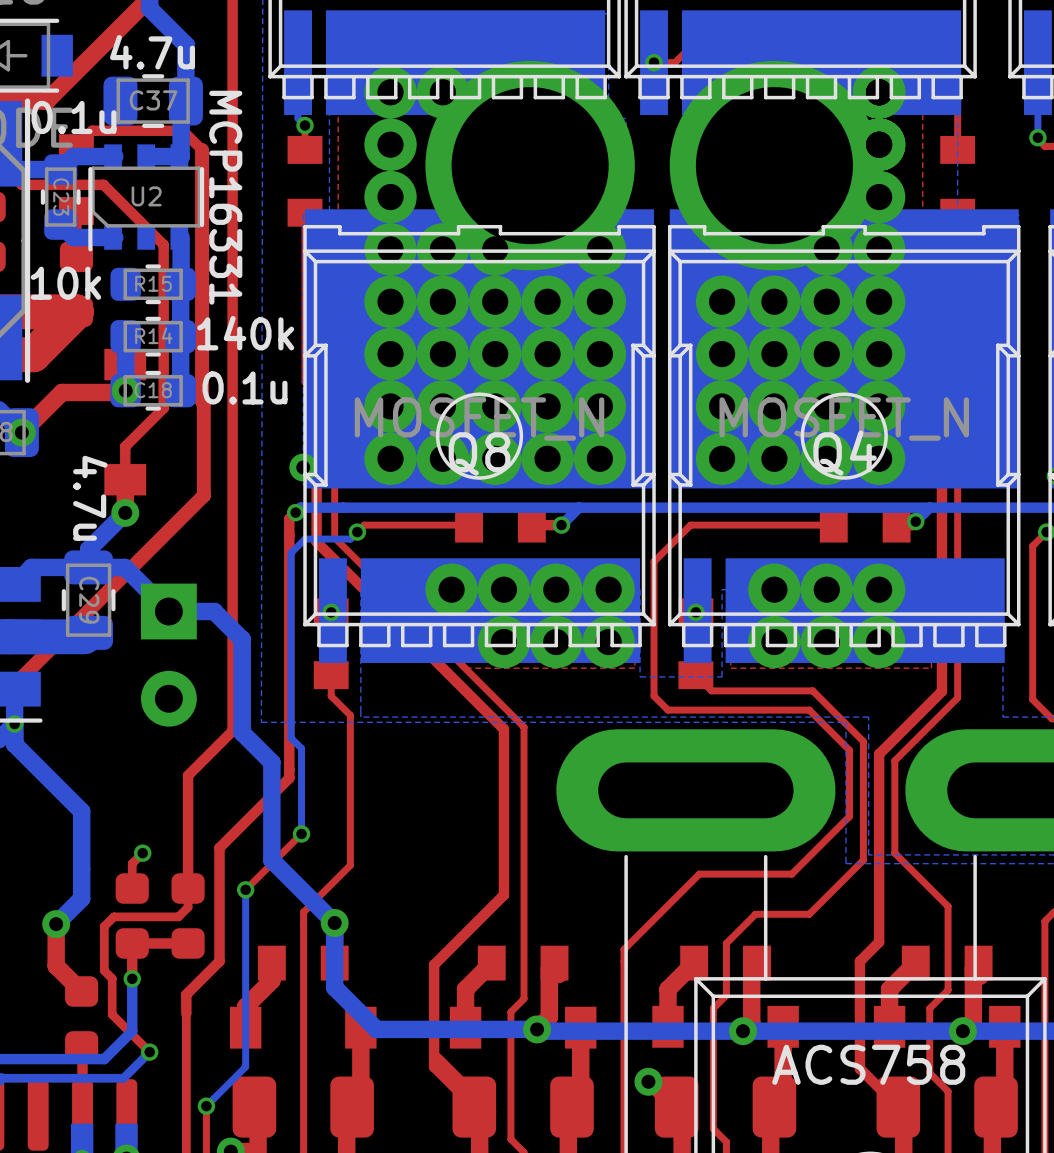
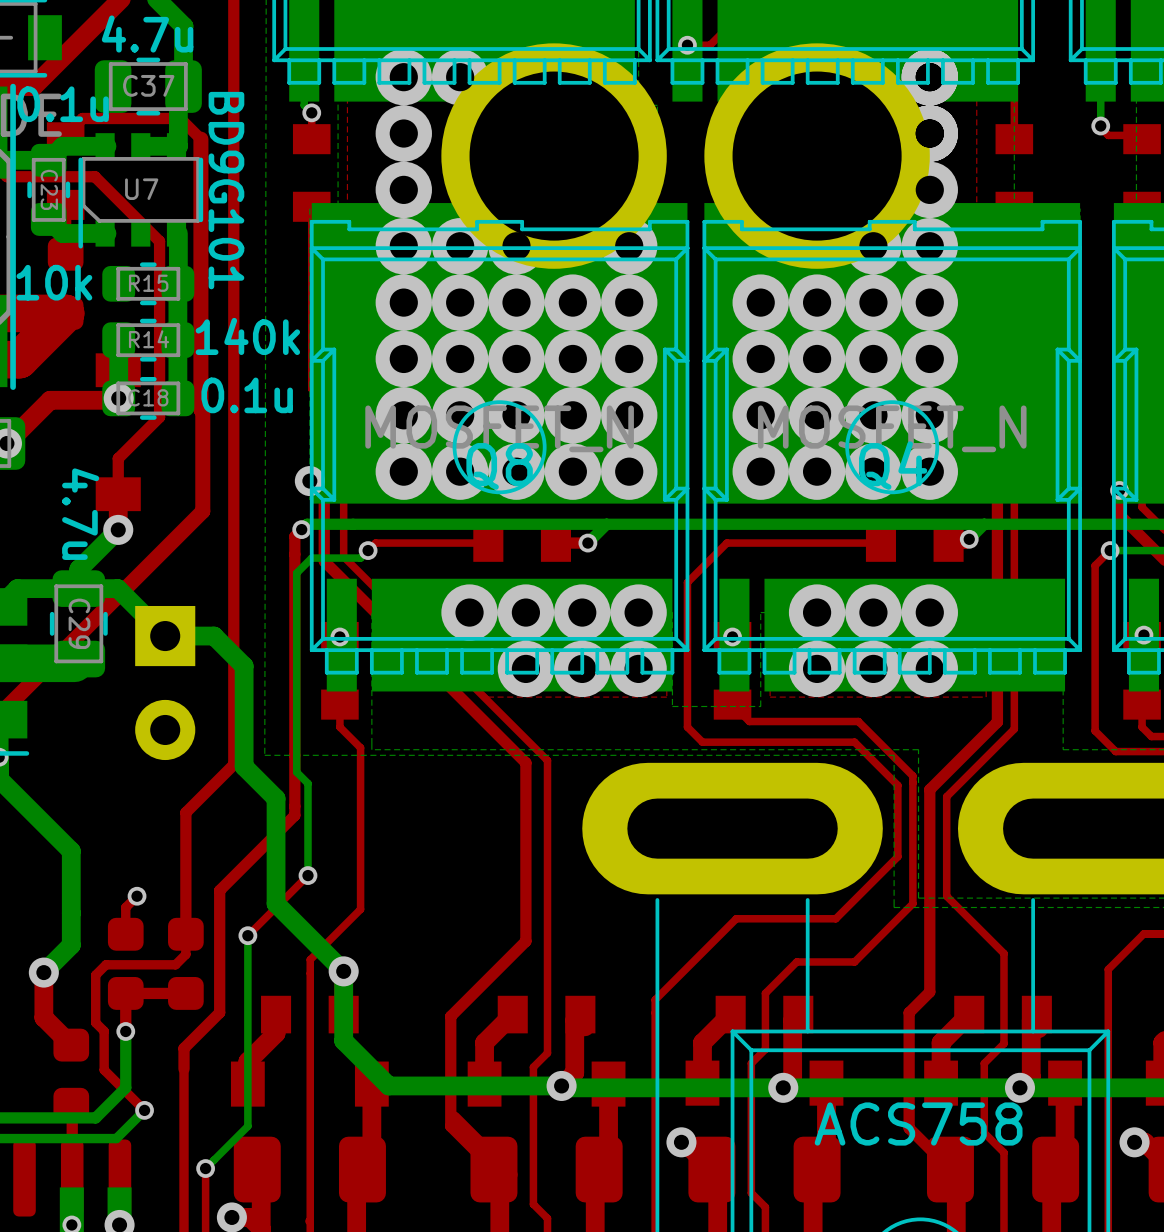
U2 name: U2 (146, 196) -> U7 (141, 189)
U2 value: MCP16331 (225, 197) -> BD9G101 (226, 190)

